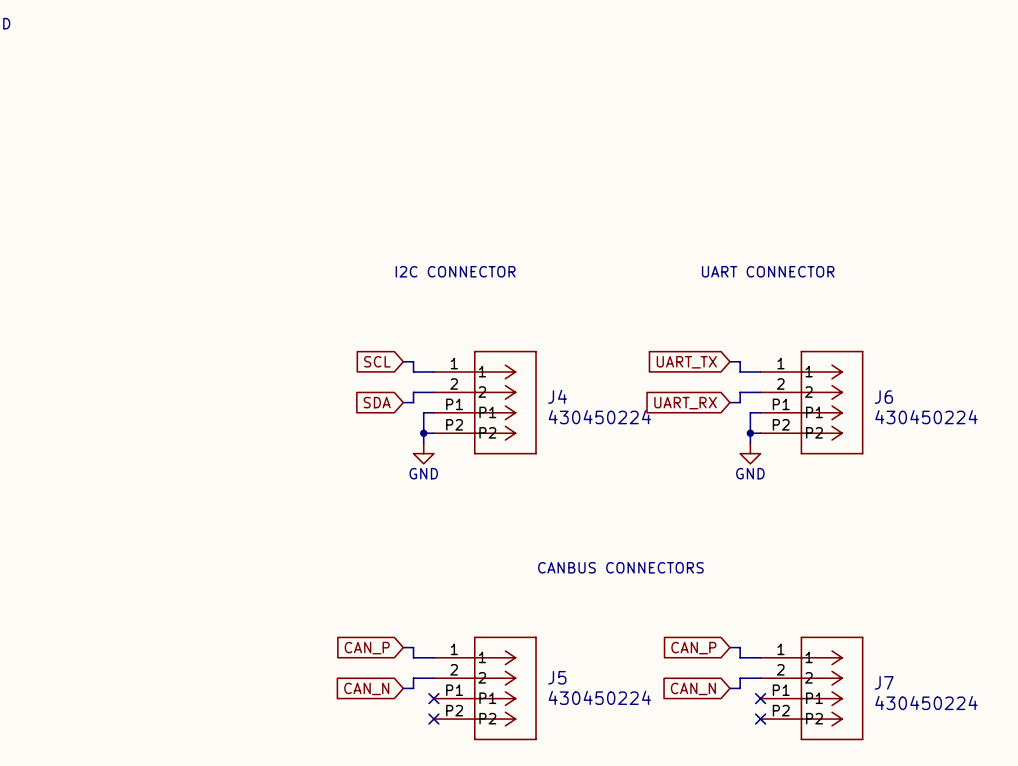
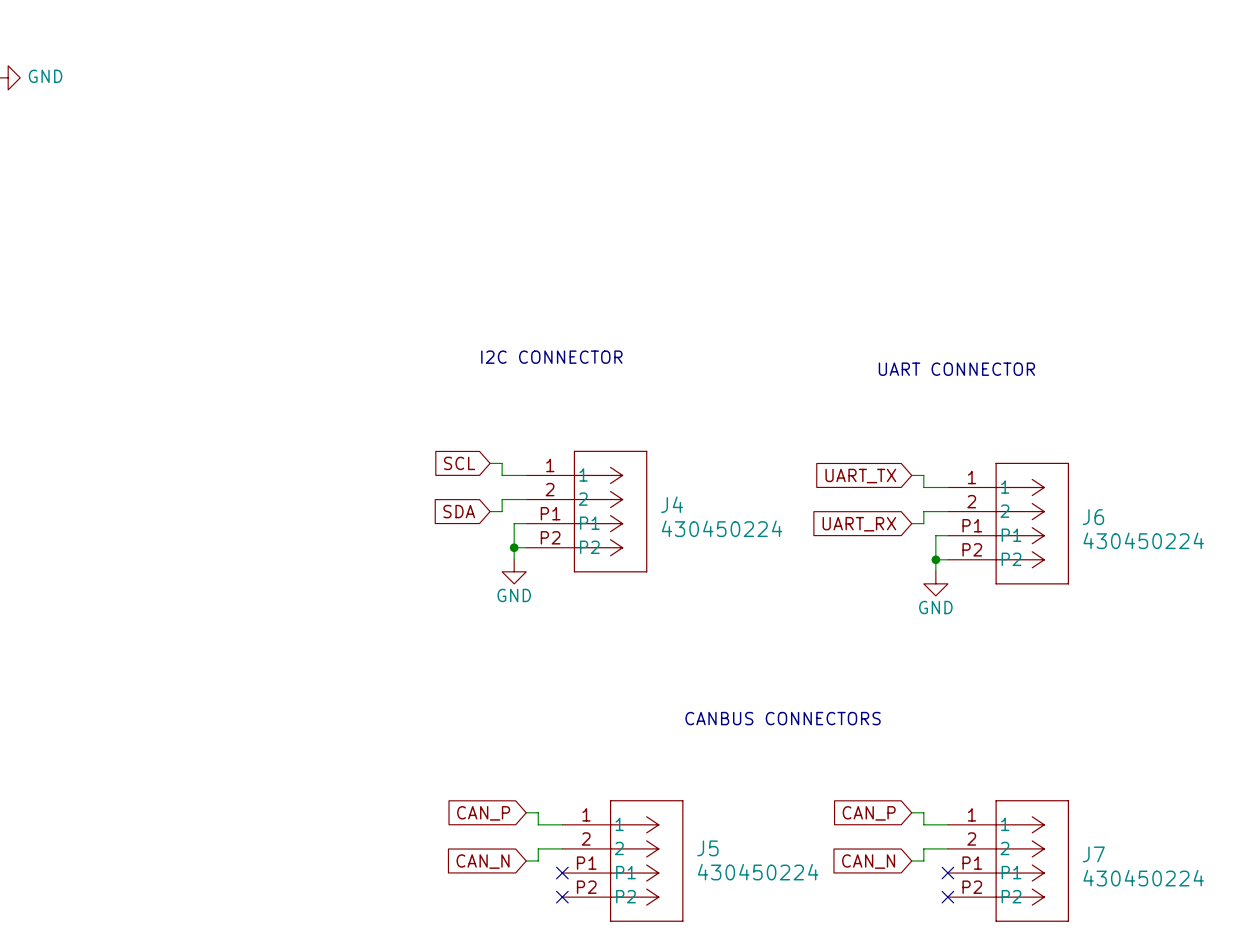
text position: I2C CONNECTOR (455, 271) -> I2C CONNECTOR (551, 357)
global label position: SCL (377, 361) -> SCL (459, 463)
wire: (403, 361) (413, 361) (413, 371) (433, 371) -> (526, 475) (502, 475) (502, 463) (490, 463)
wire: none -> (526, 499) (502, 499) (502, 511) (490, 511)
wire: (433, 392) (413, 392) (413, 402) (403, 402) -> (514, 559) (514, 523) (526, 523)
global label position: SDA (377, 402) -> SDA (459, 511)
J4 position: (485, 402) -> (586, 511)
wire: (433, 412) (423, 412) (423, 443) -> none
wire: (423, 433) (433, 433) -> (514, 547) (526, 547)
junction position: (423, 433) -> (514, 547)
power symbol position: GND (423, 453) -> GND (514, 571)

